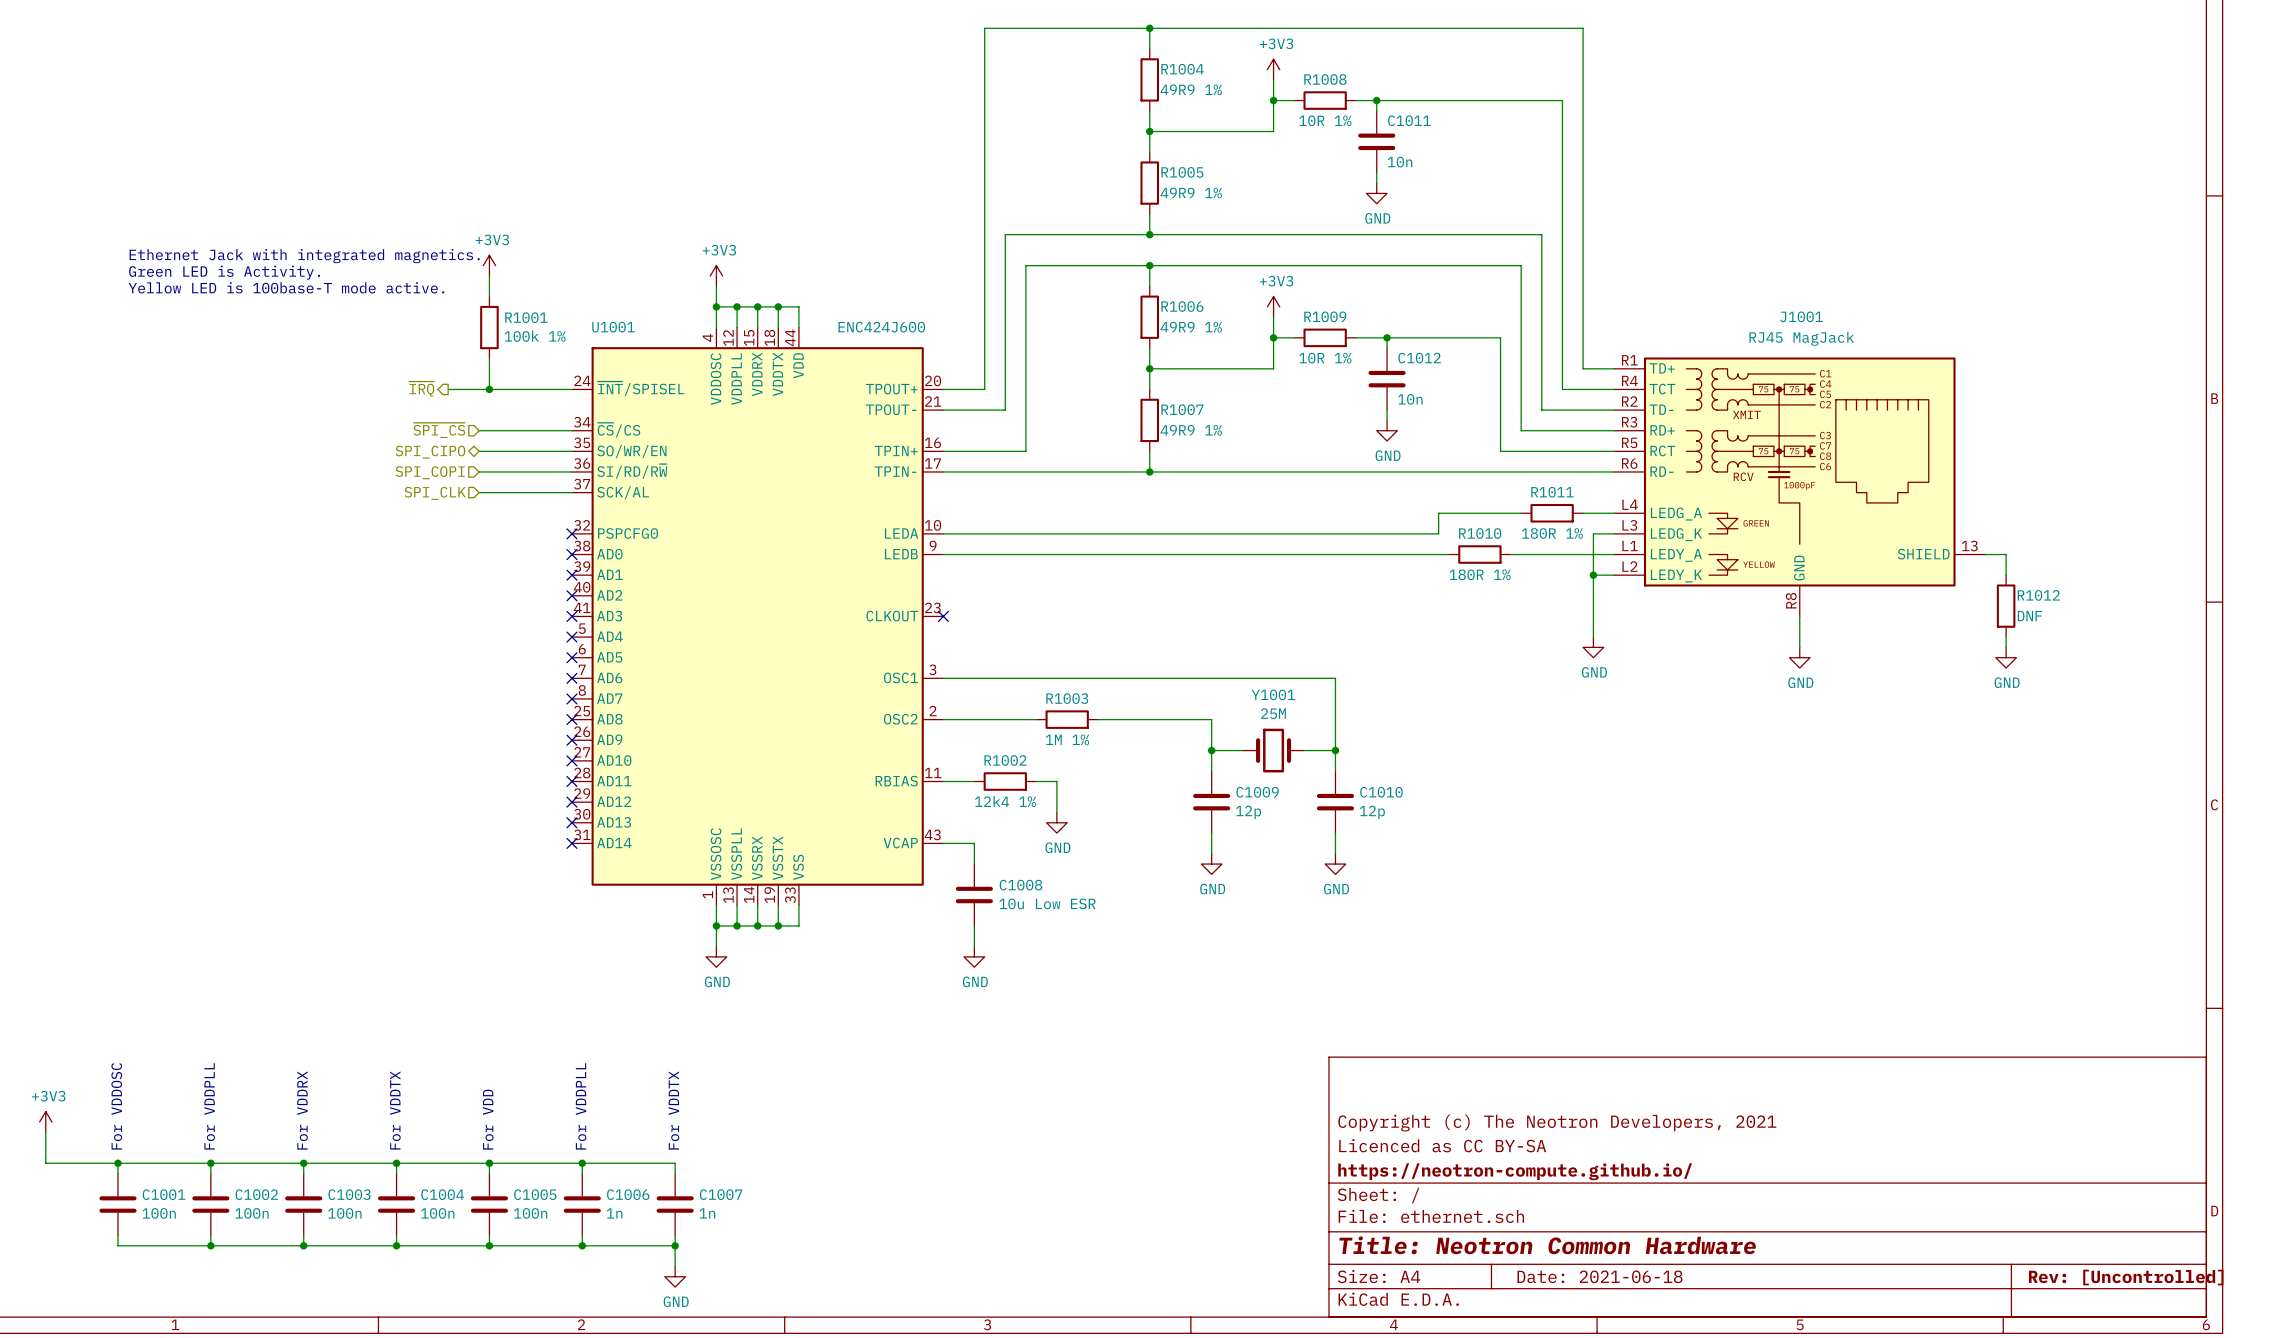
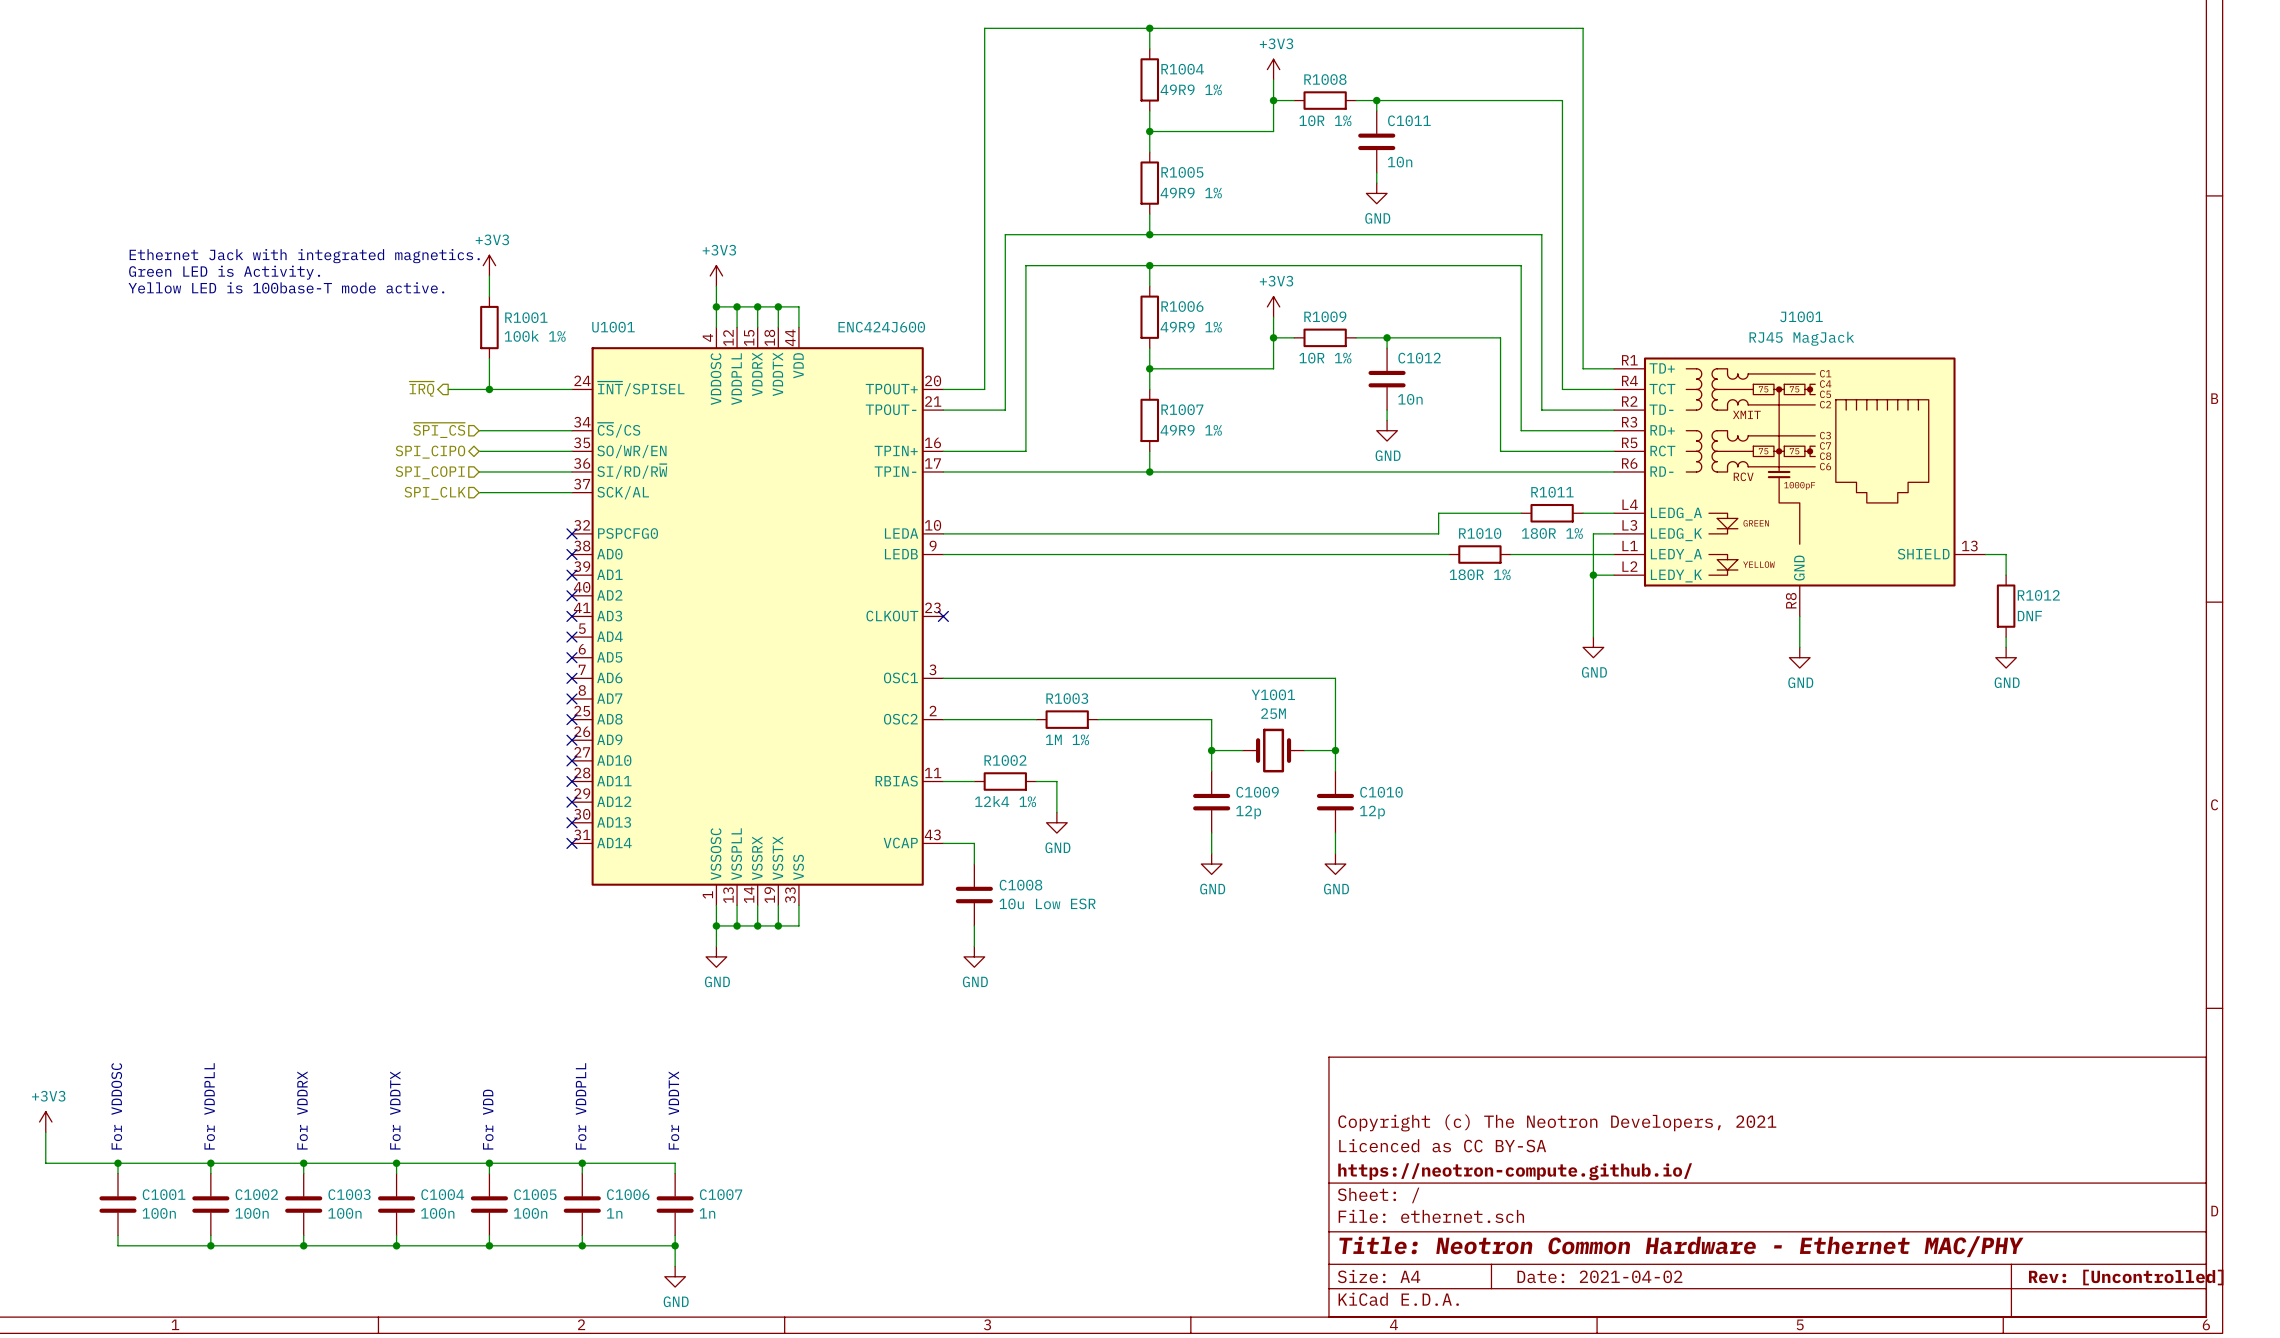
title block: Title: Neotron Common Hardware (1547, 1245) -> Title: Neotron Common Hardware - Ethernet MAC/PHY (1681, 1246)
title block: Date: 2021-06-18 (1599, 1276) -> Date: 2021-04-02 (1599, 1276)

